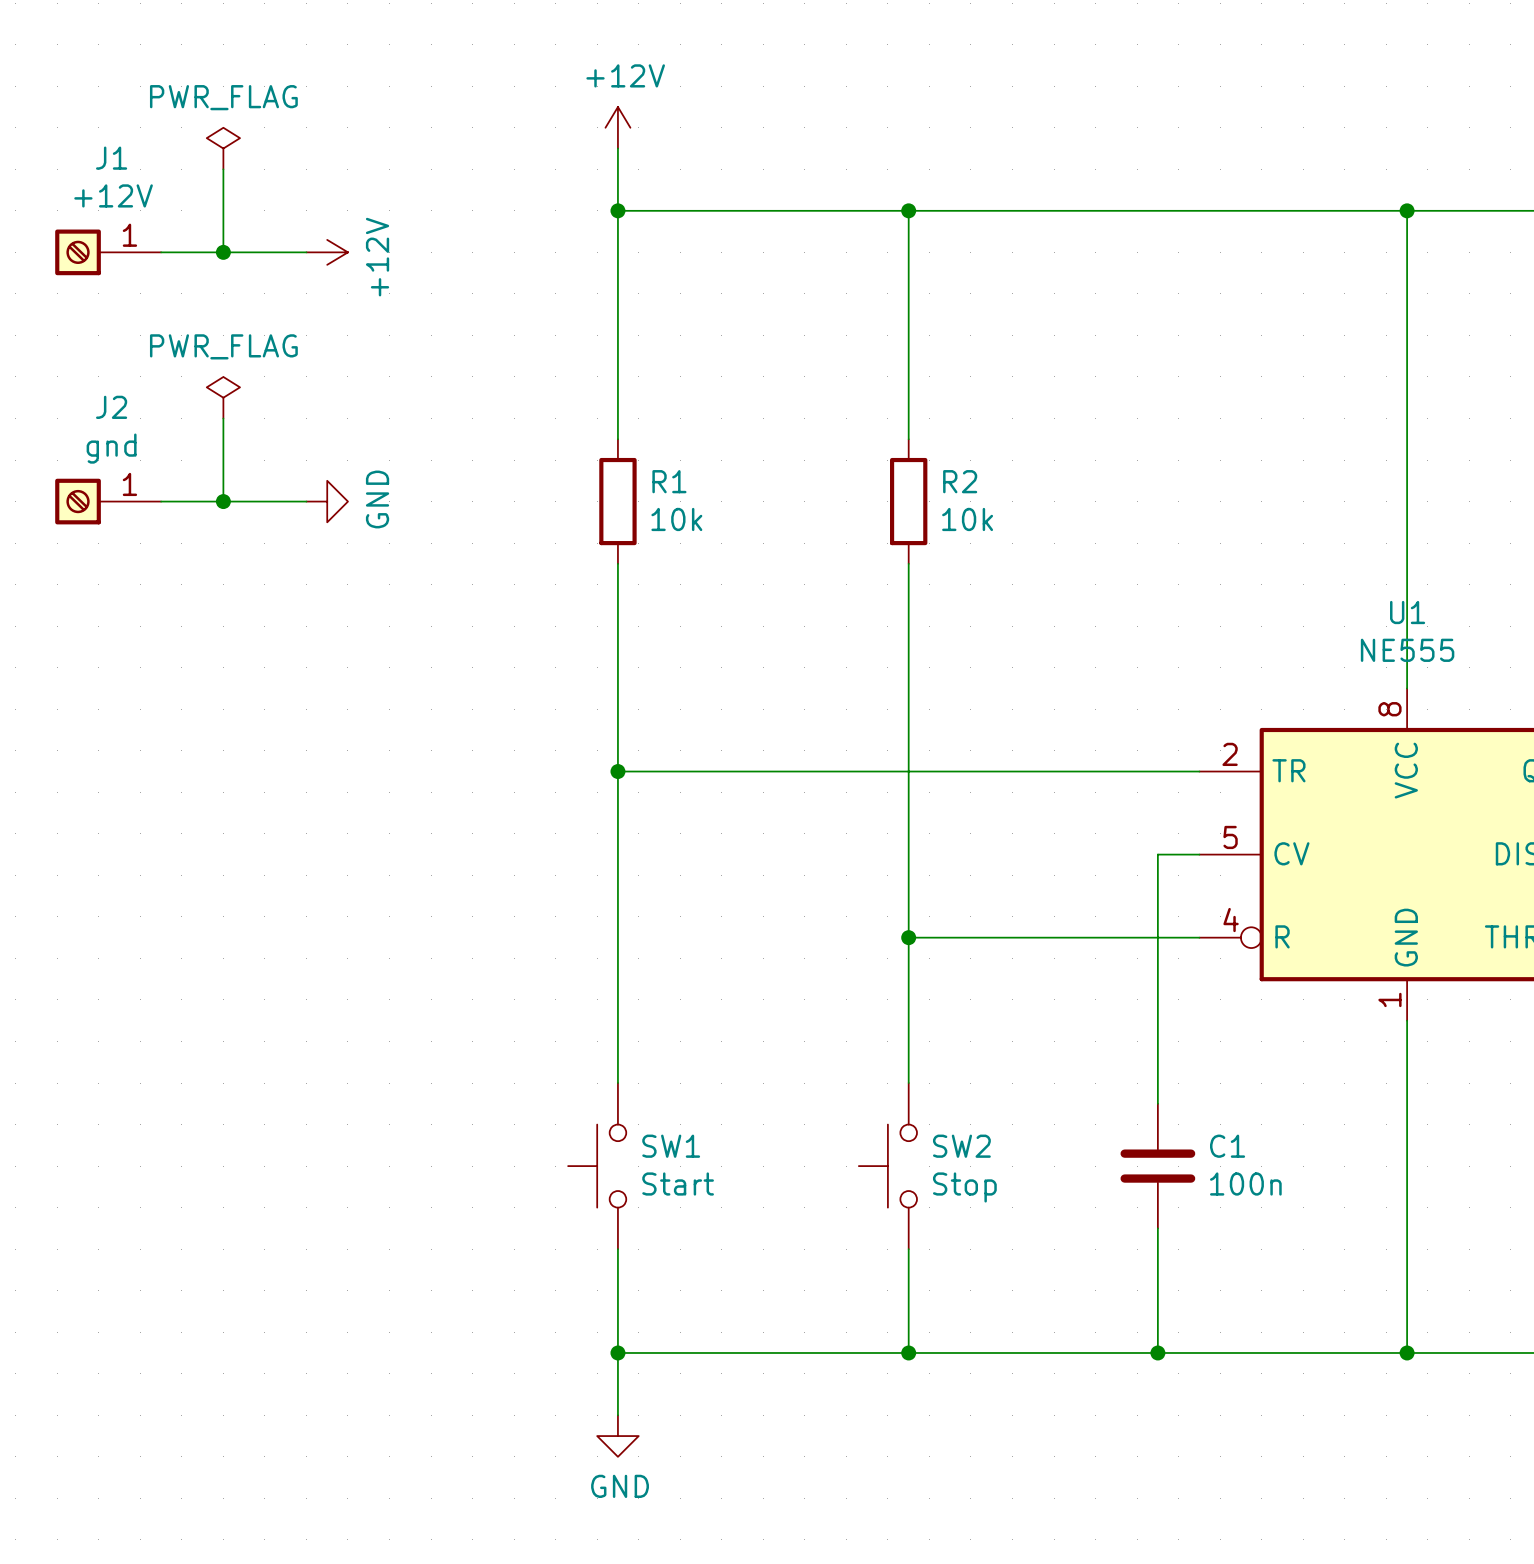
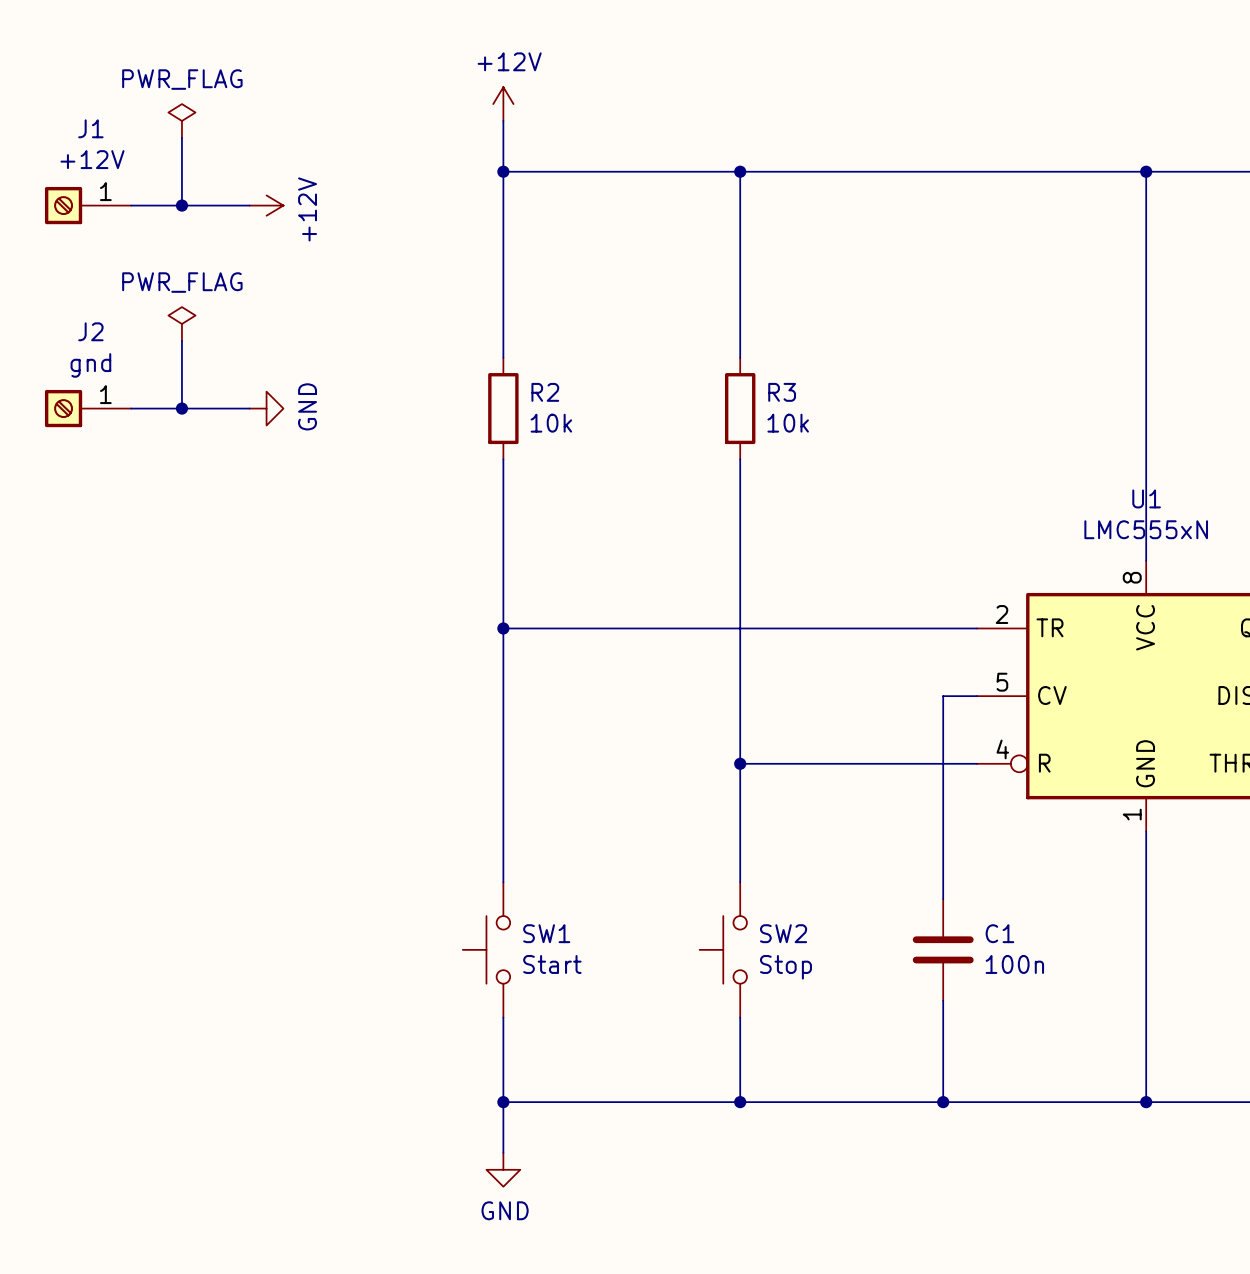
R1 name: R1 (669, 481) -> R2 (545, 392)
R2 name: R2 (960, 481) -> R3 (782, 392)
U1 value: NE555 (1407, 650) -> LMC555xN (1146, 529)

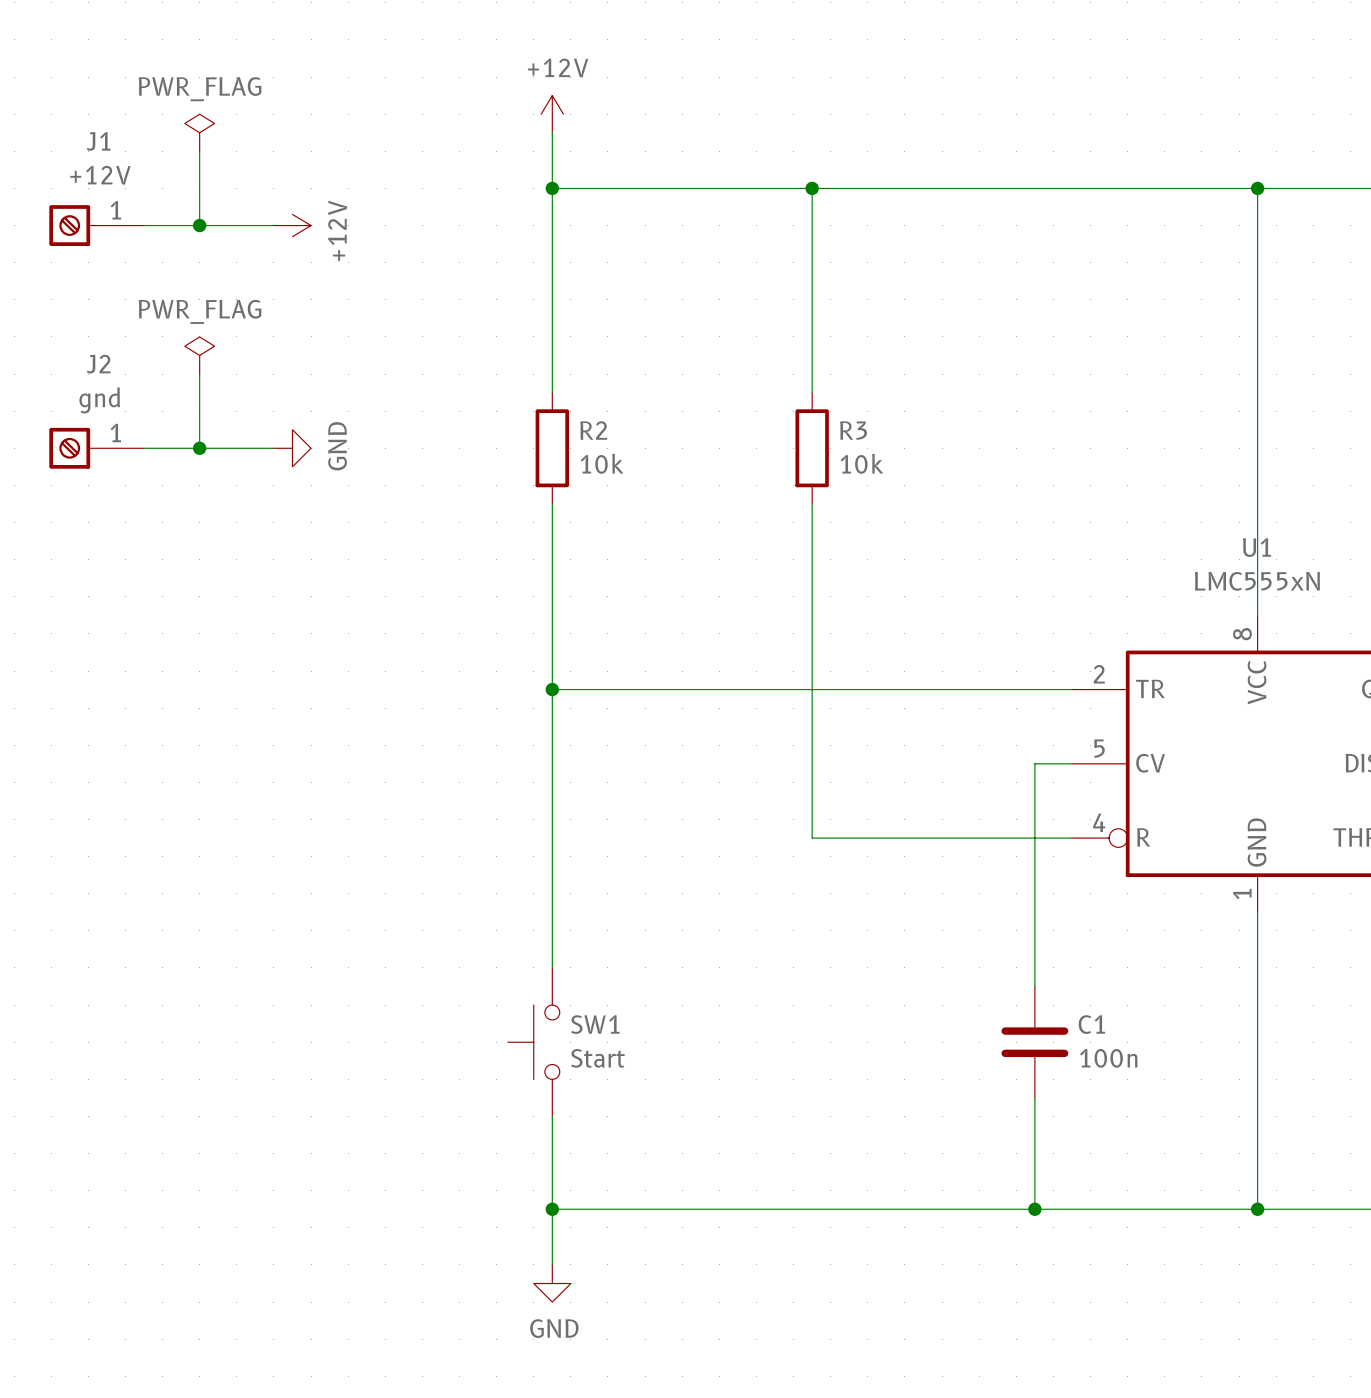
wire: (740, 763) (740, 882) -> none
junction: (740, 763) -> none
SW2: Stop (723, 949) -> none
wire: (740, 1017) (740, 1102) -> none
junction: (740, 1102) -> none

